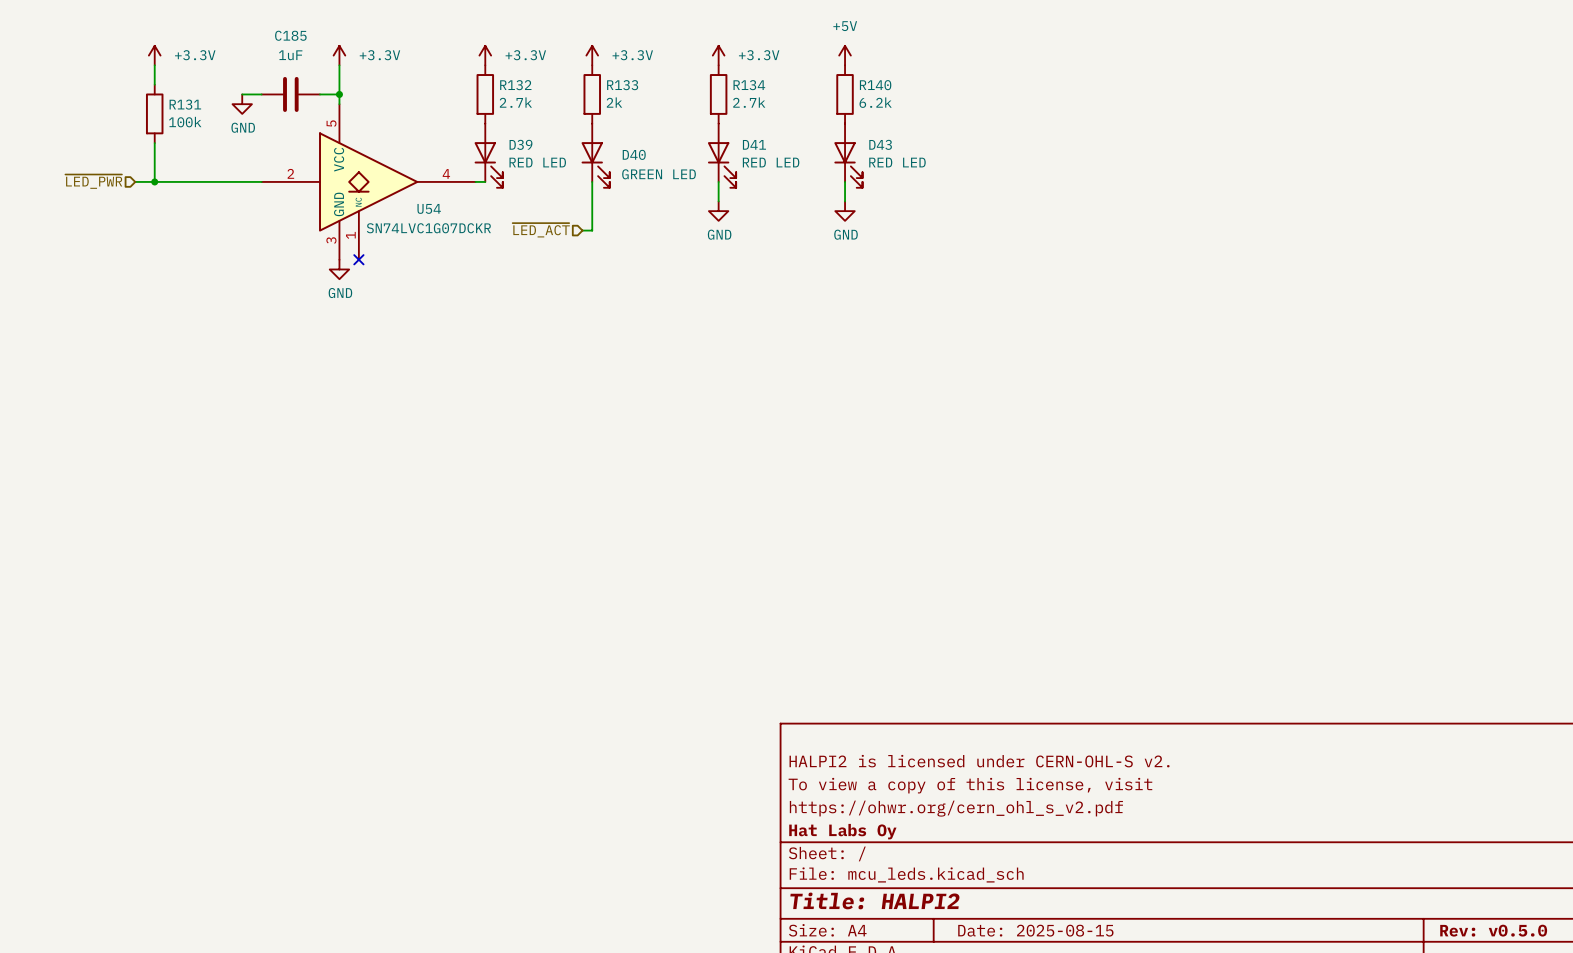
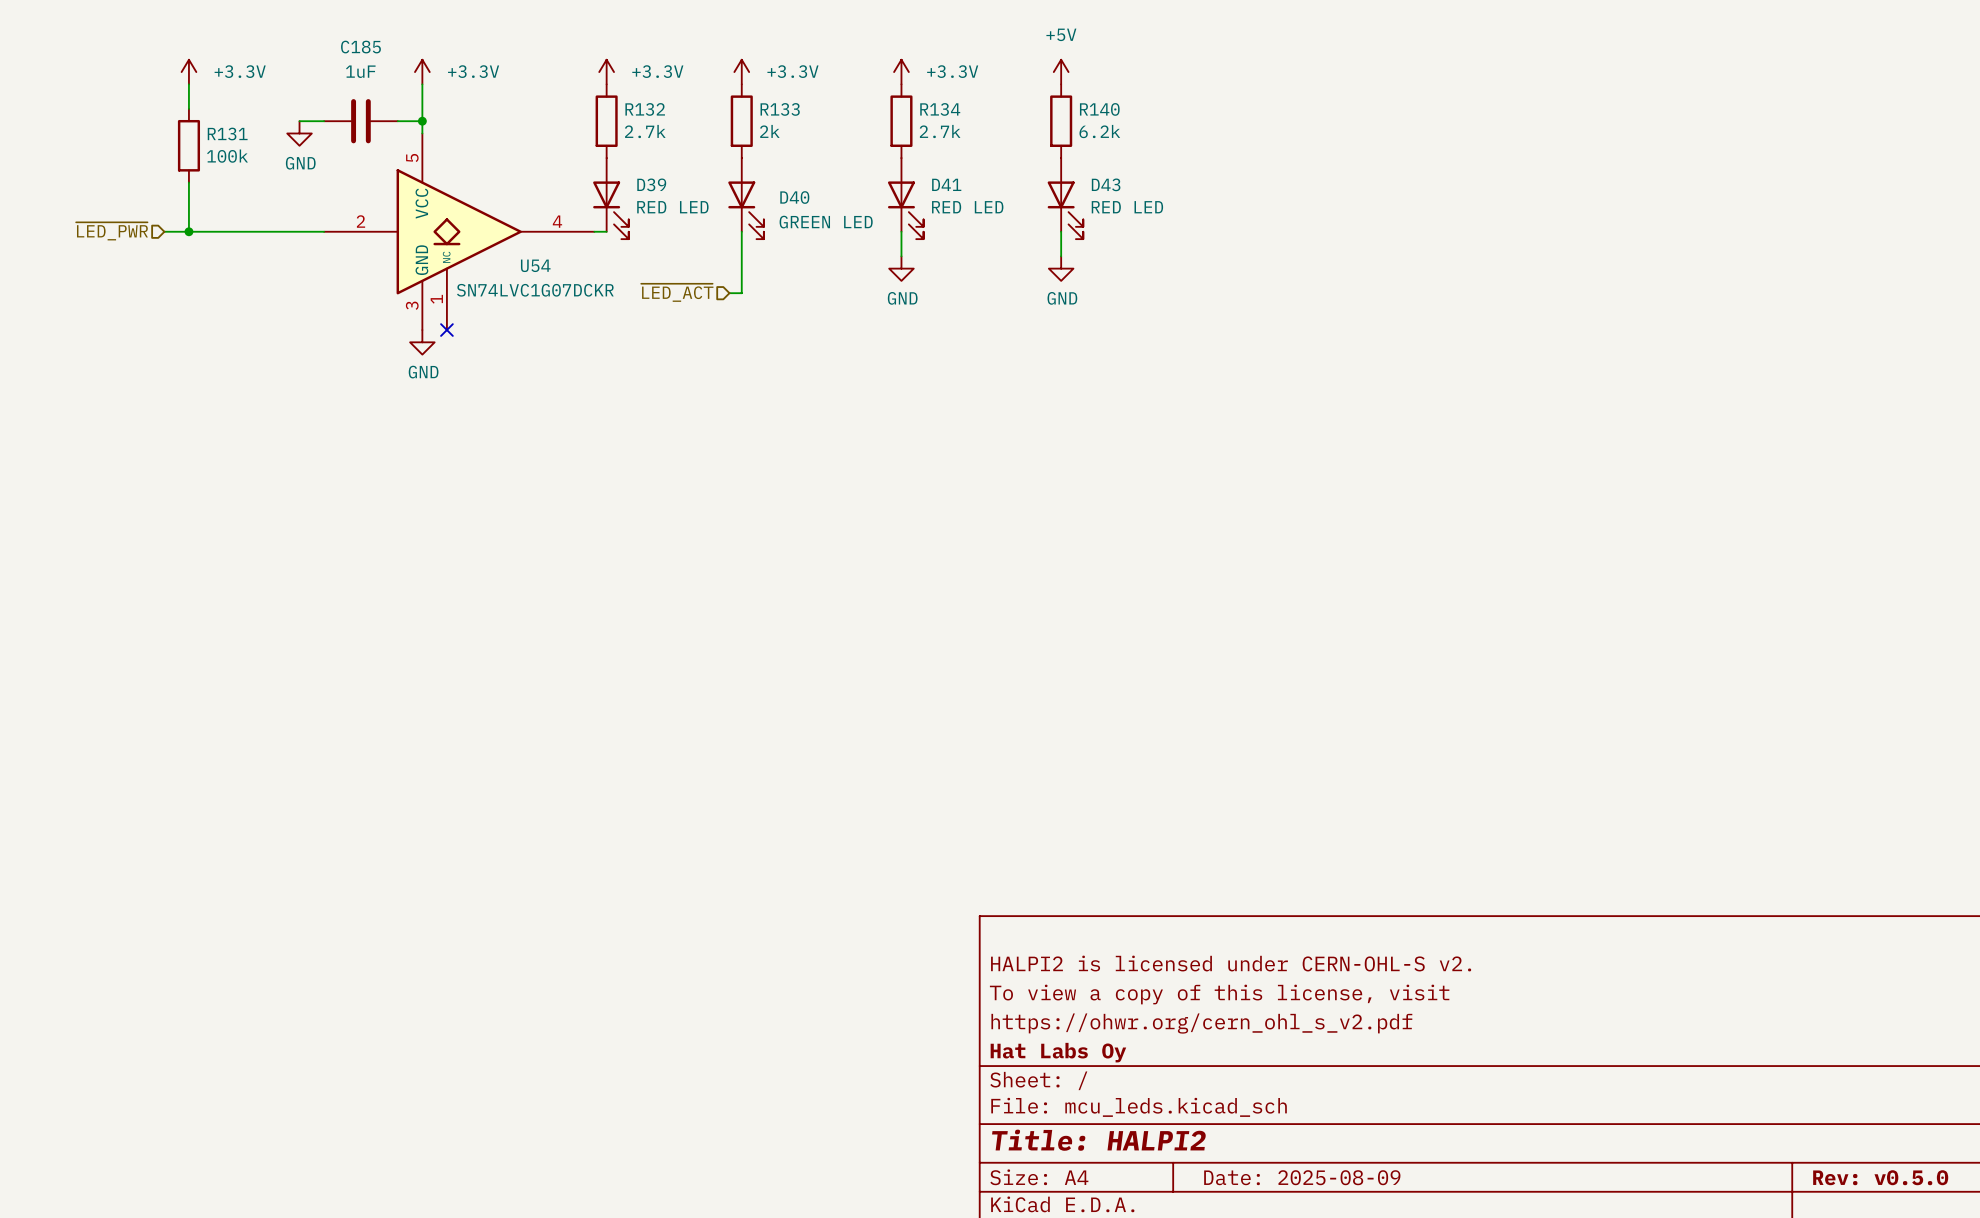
title block: Date: 2025-08-15 (1035, 930) -> Date: 2025-08-09 (1302, 1177)

